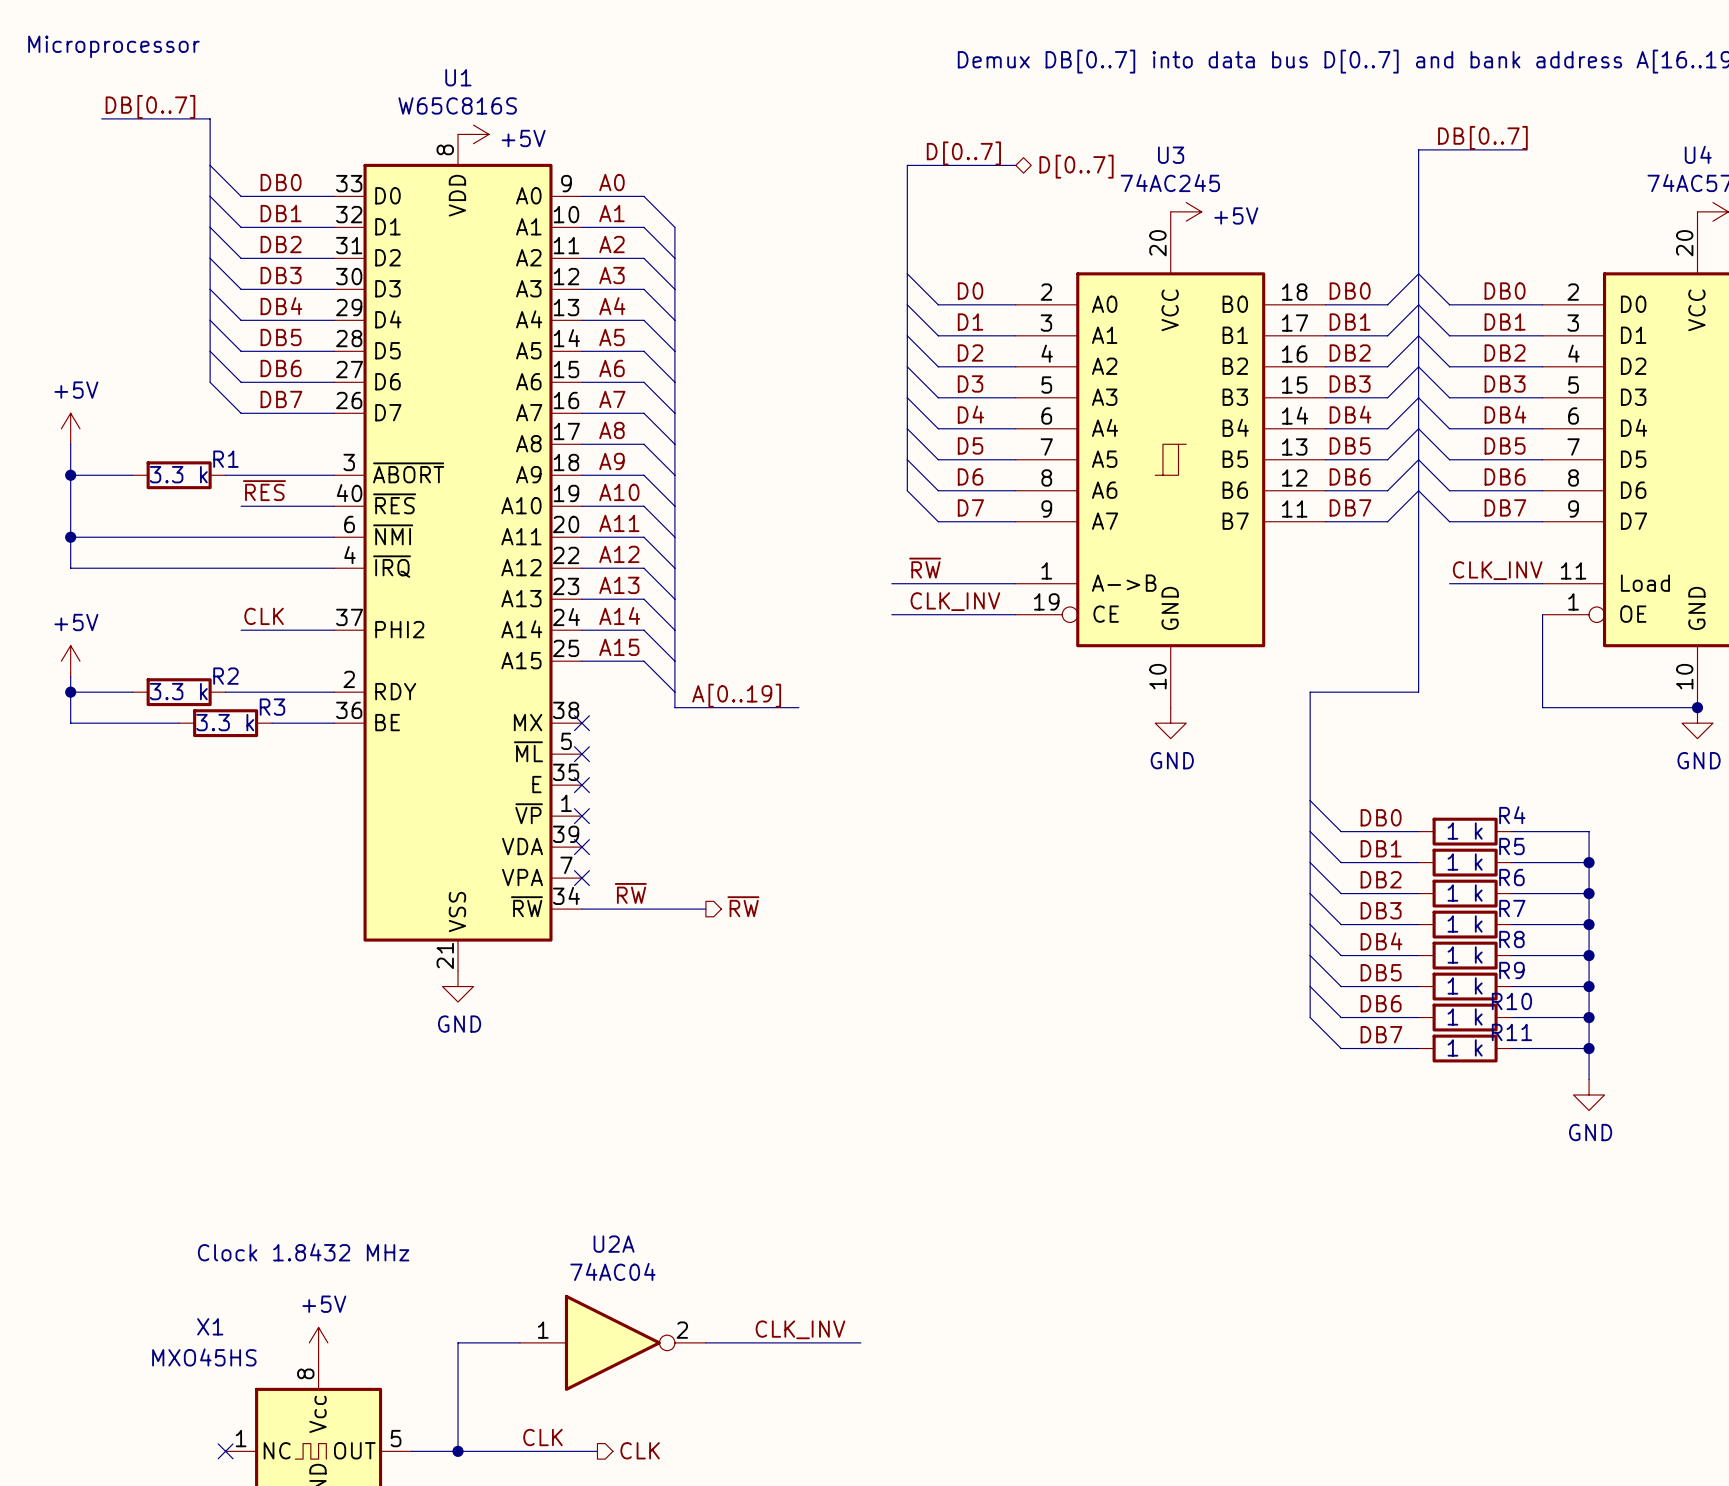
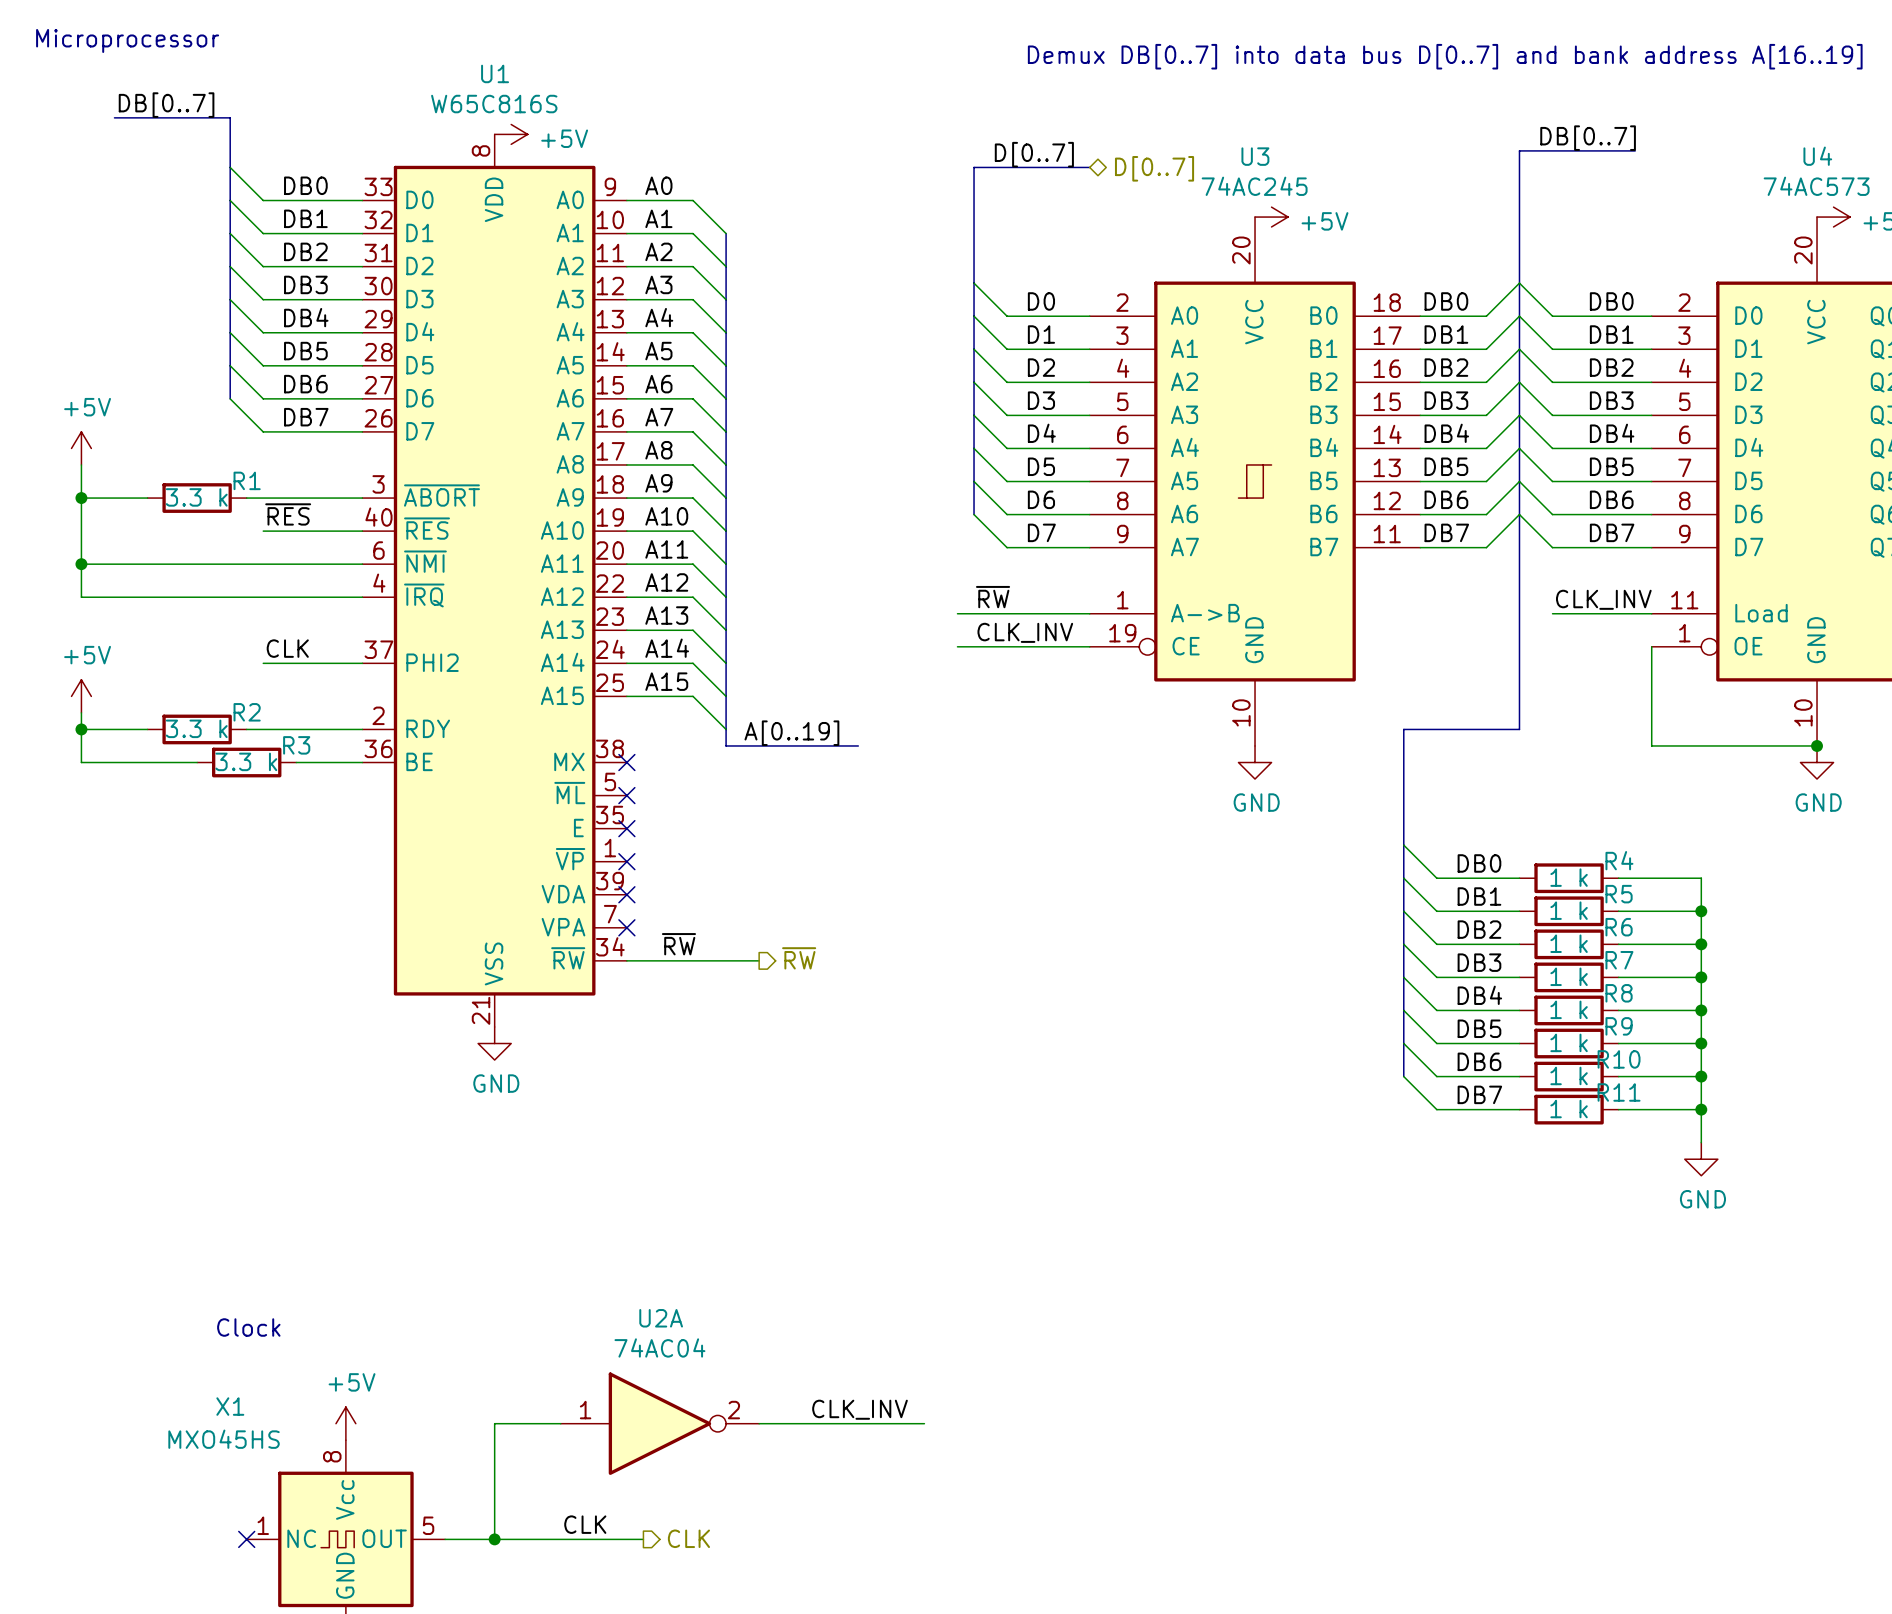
text: Clock 1.8432 MHz (303, 1252) -> Clock (248, 1327)

